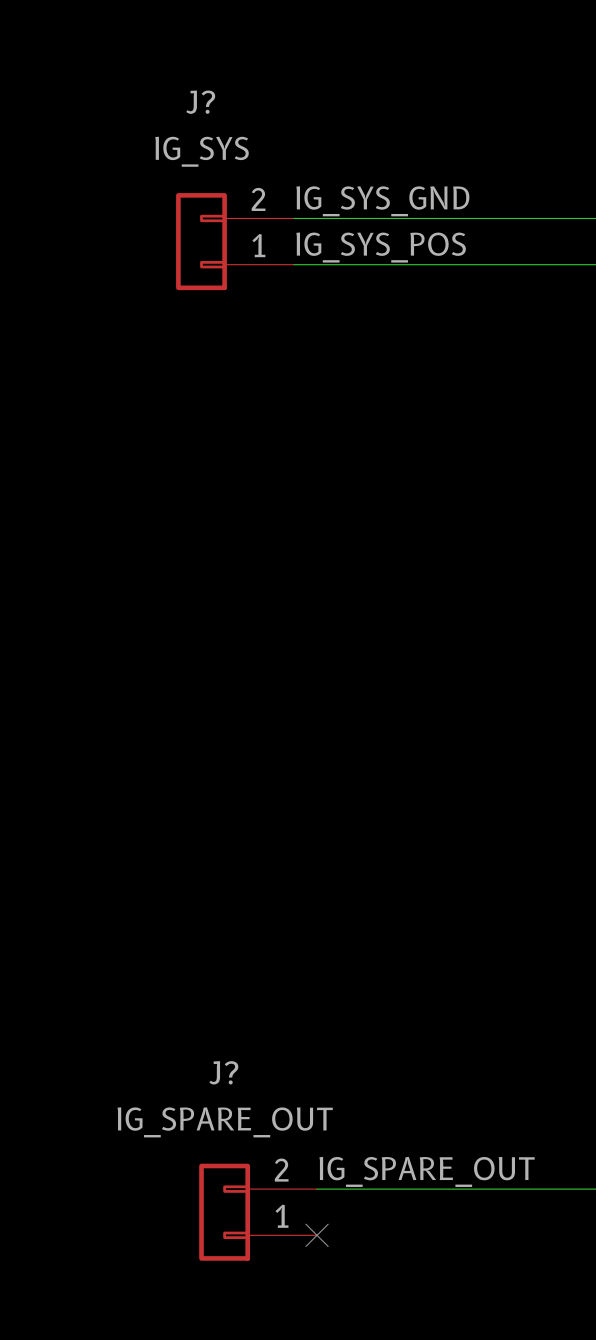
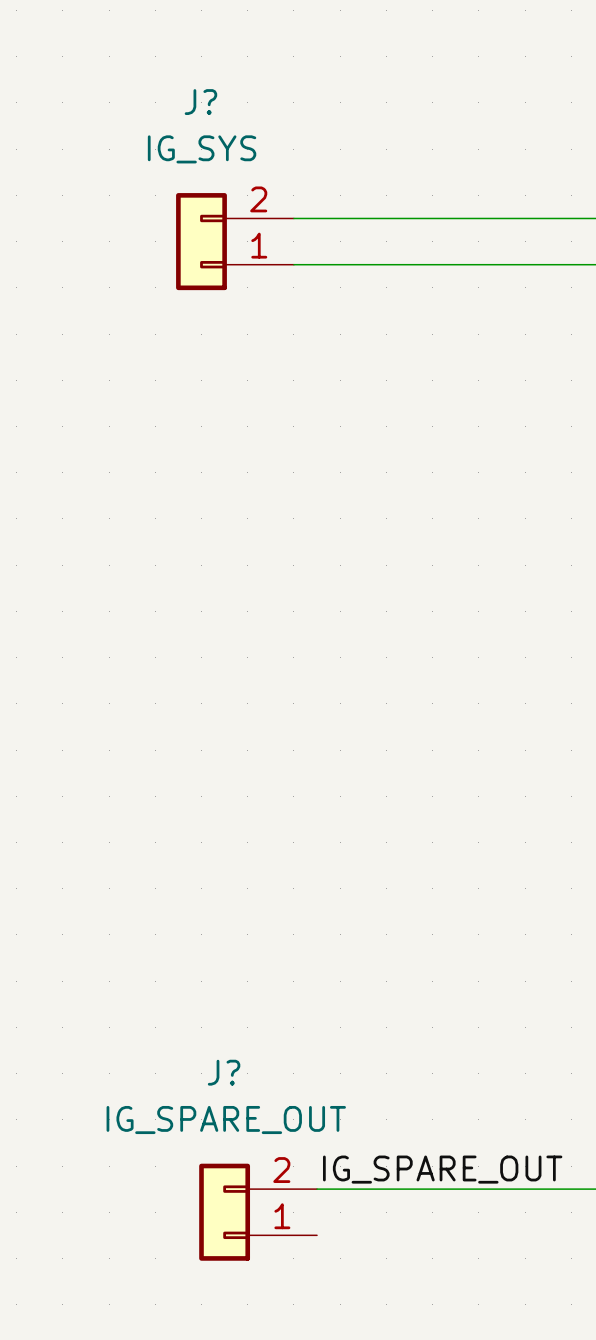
label: IG_SYS_GND (382, 201) -> none
label: IG_SYS_POS (381, 247) -> none
no-connect mark: (317, 1235) -> none

